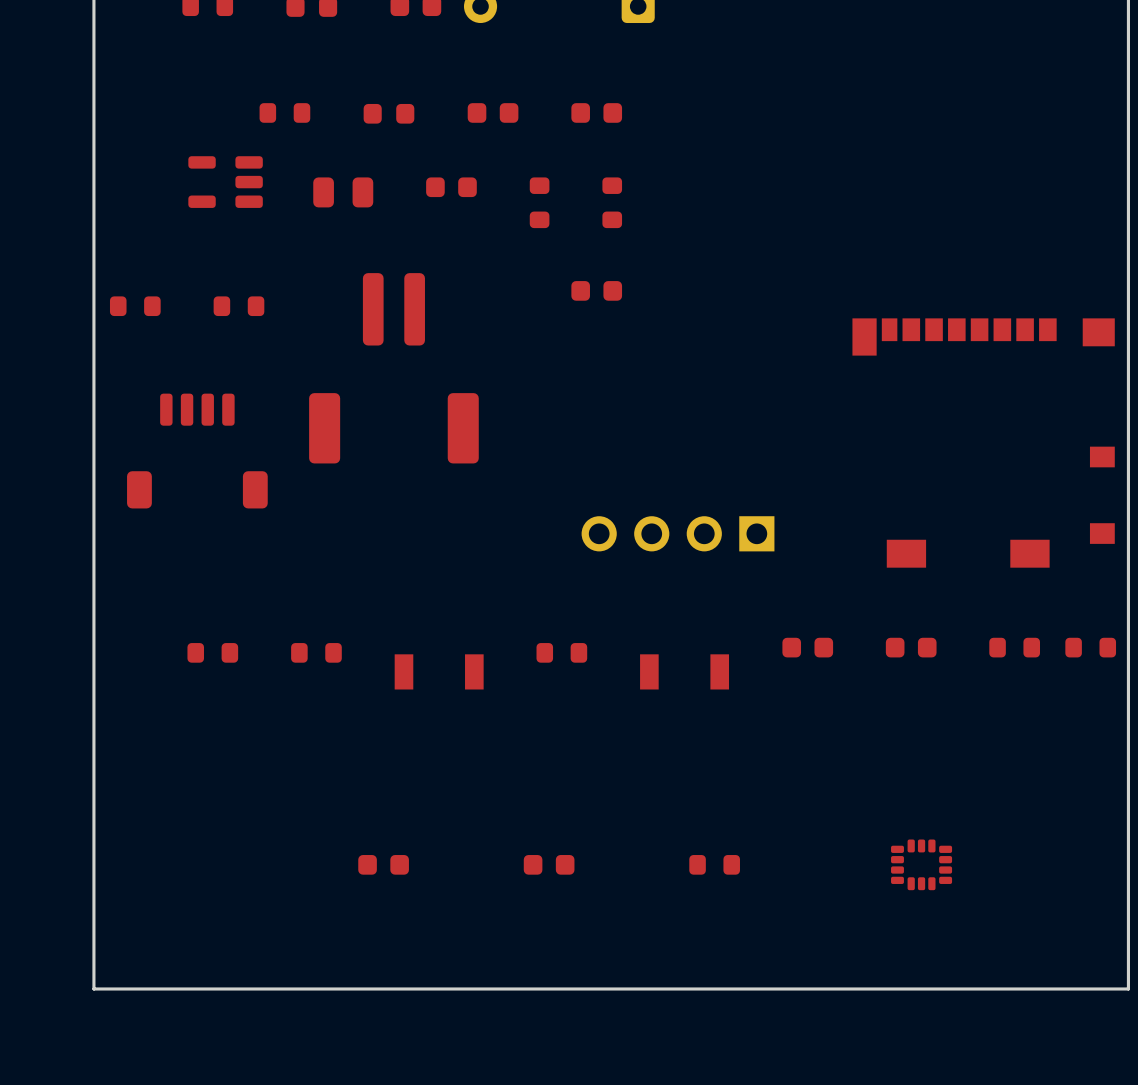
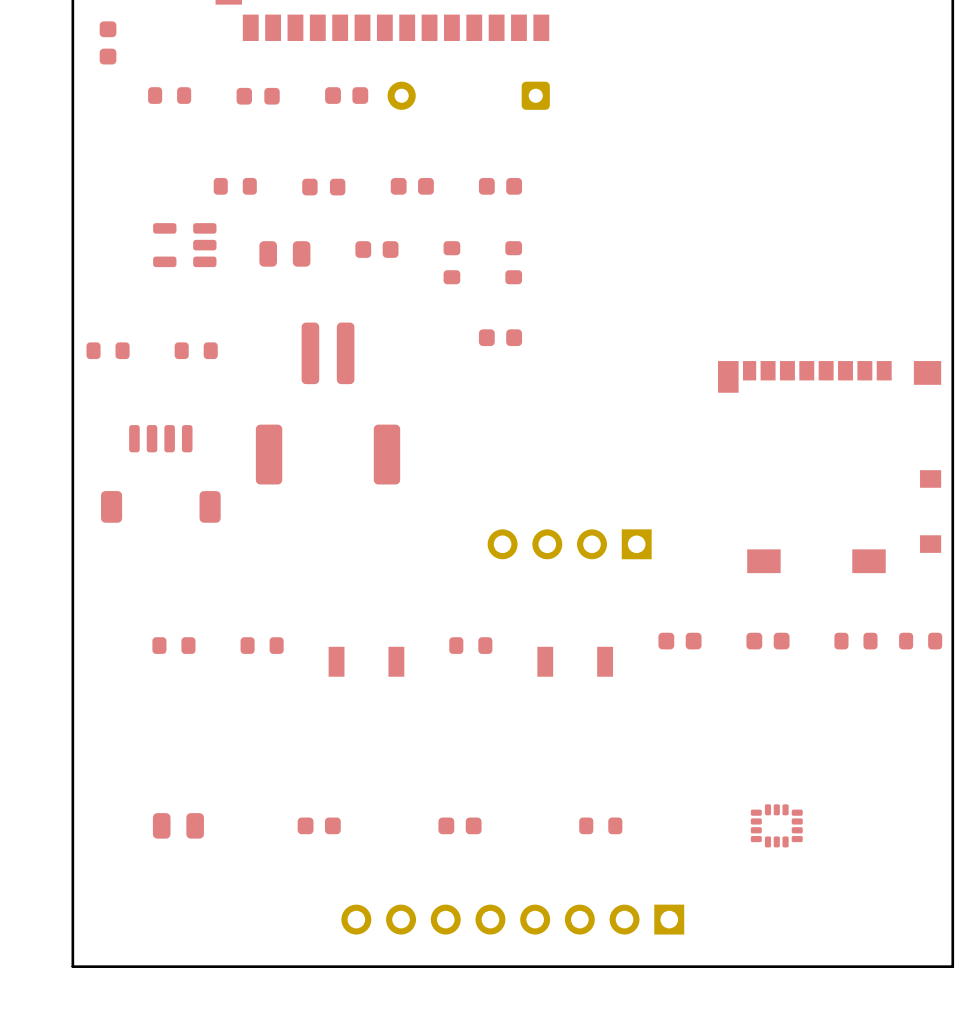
part: none -> (178, 825)
part: none -> (512, 919)
board edge: (1128, 988) (93, 988) -> (952, 931) (952, 966) (72, 966) (72, 931)

